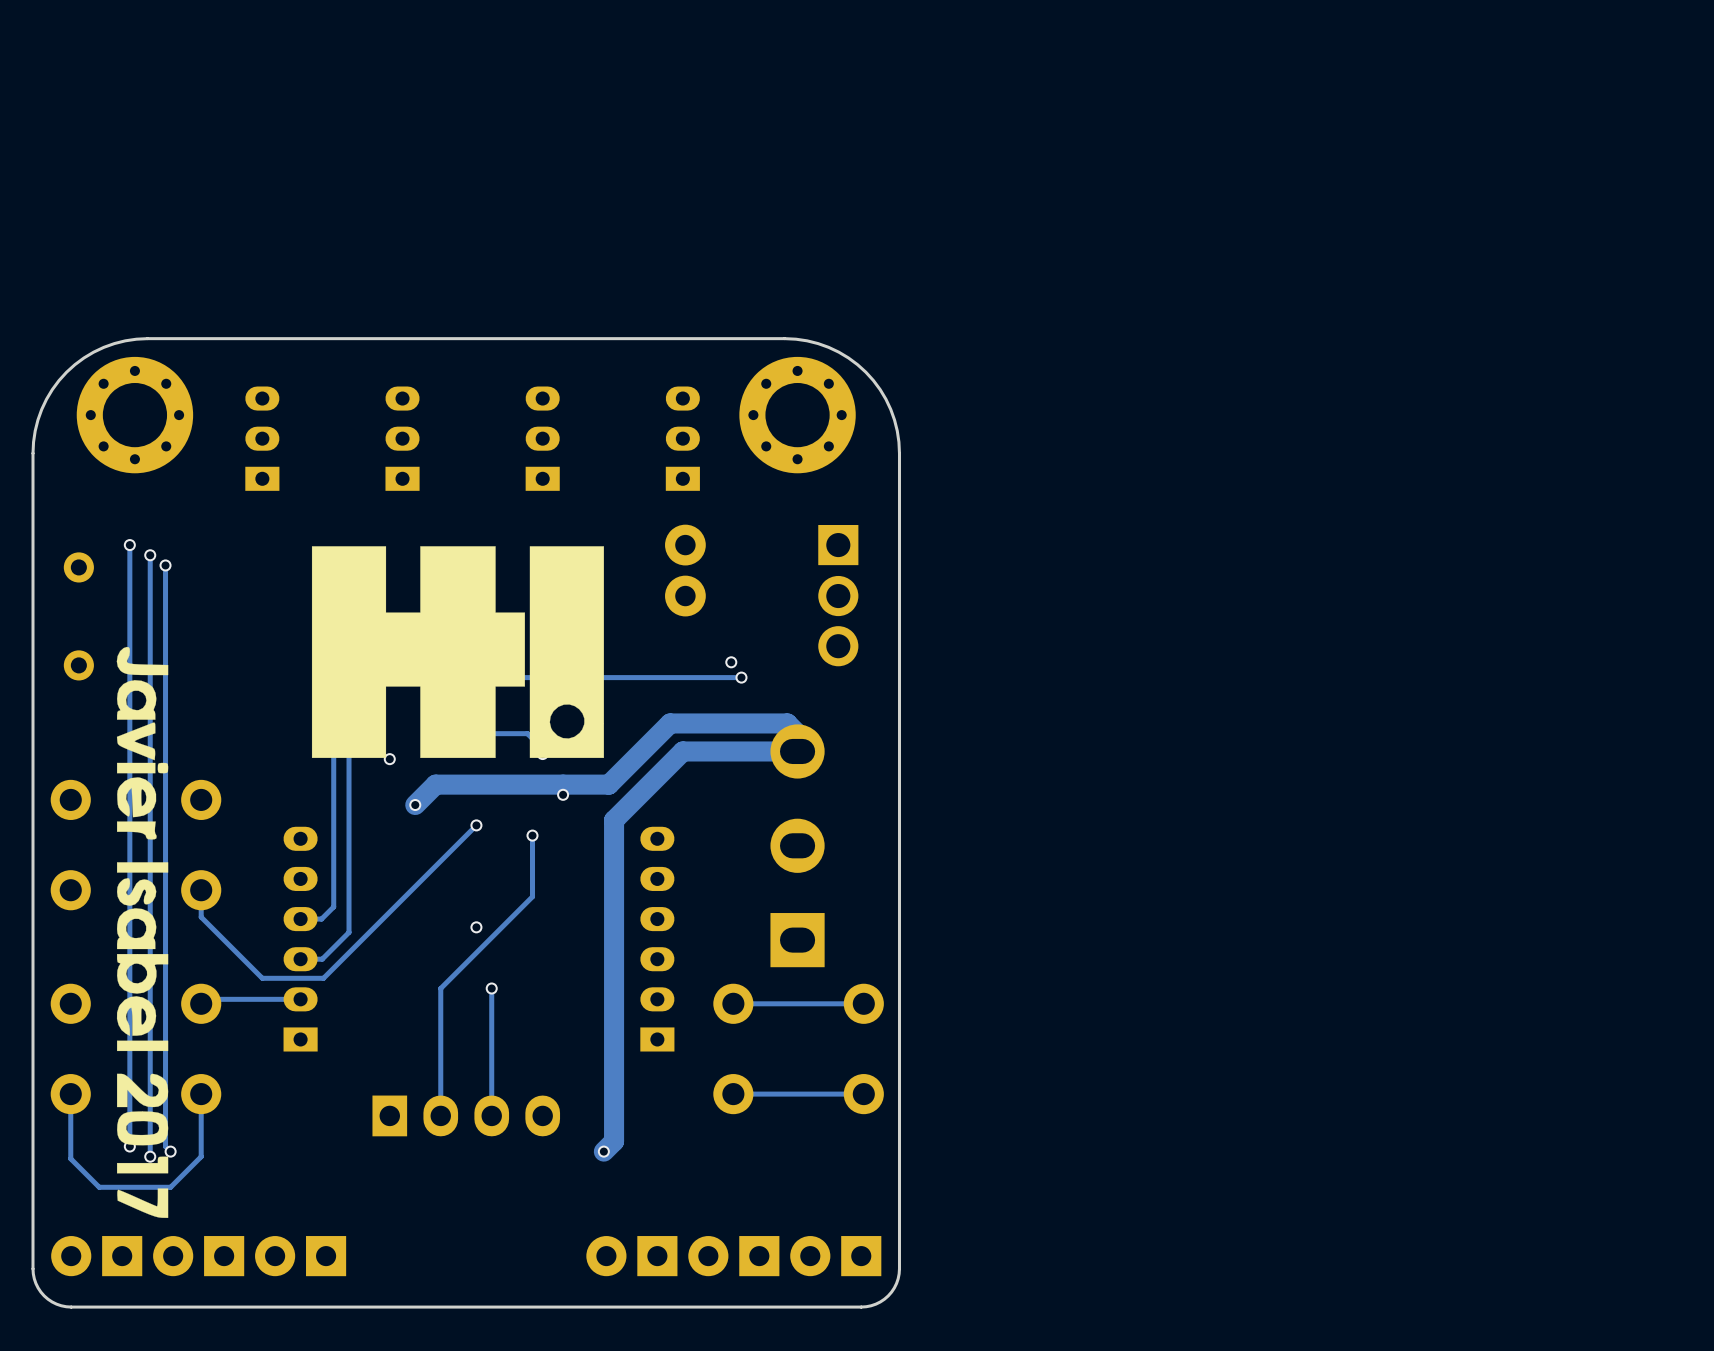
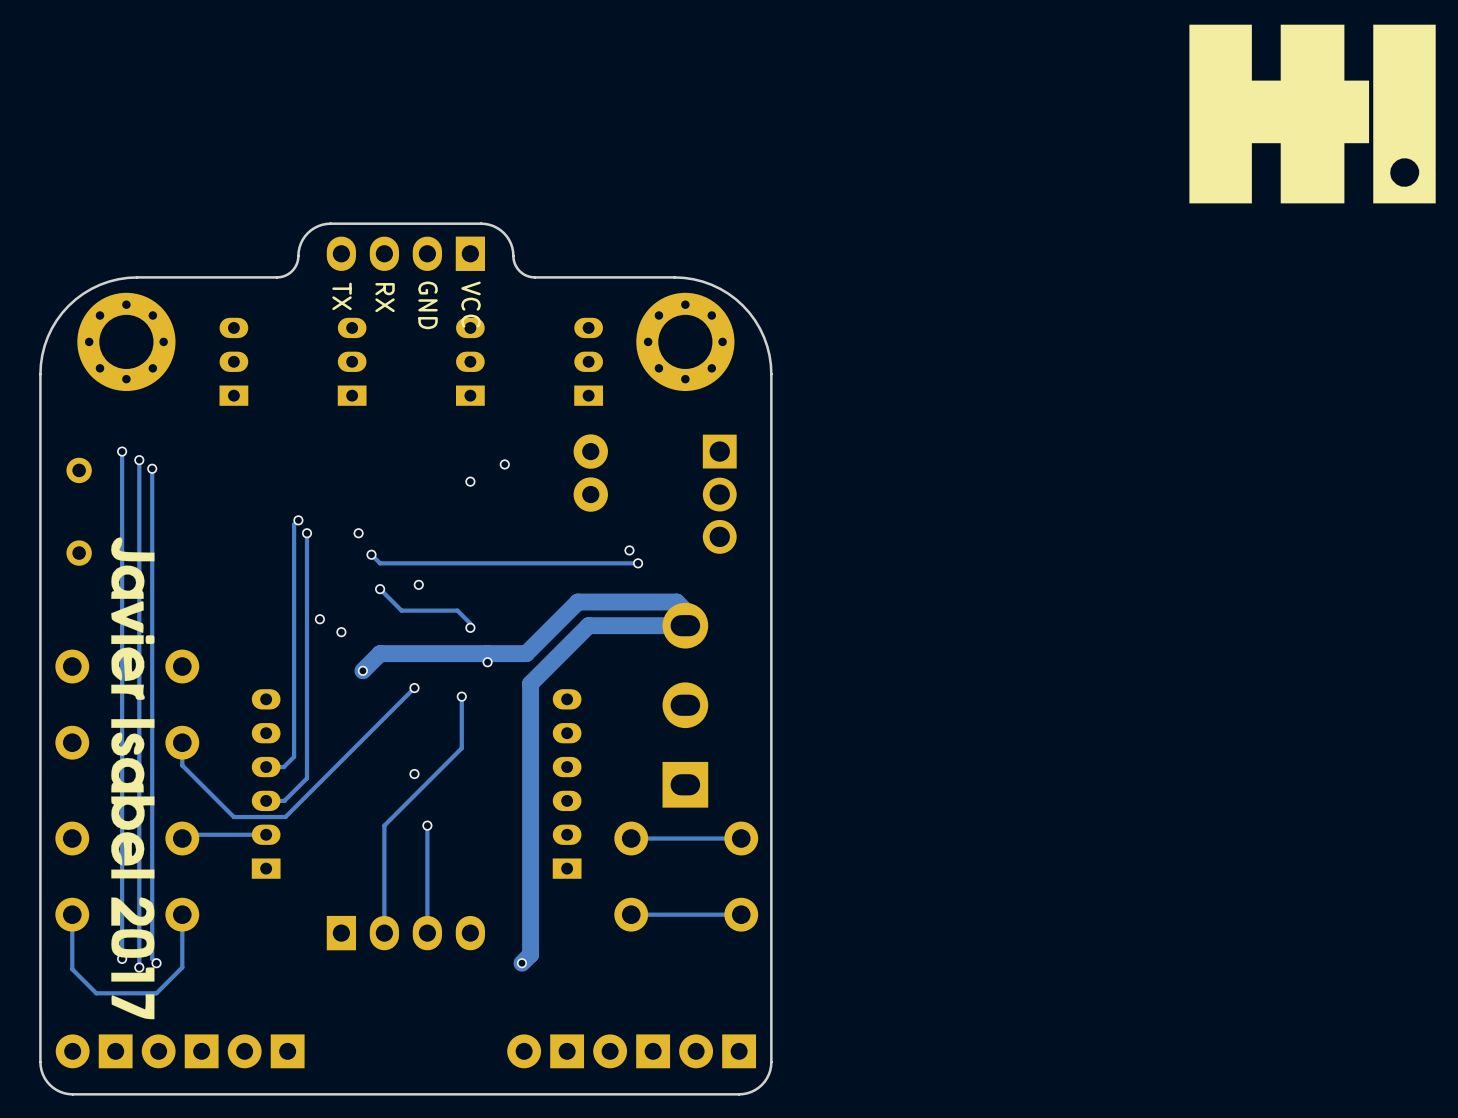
drawing: none -> [1189, 24, 1436, 204]
part: none -> (405, 253)
board edge: (619, 338) (313, 338) -> (534, 277) (524, 274) (517, 269) (514, 261) (510, 243) (503, 233) (493, 226) (481, 223) (322, 224) (311, 230) (302, 239) (293, 269) (285, 275) (276, 277)
drawing: [311, 546, 604, 758] -> none

